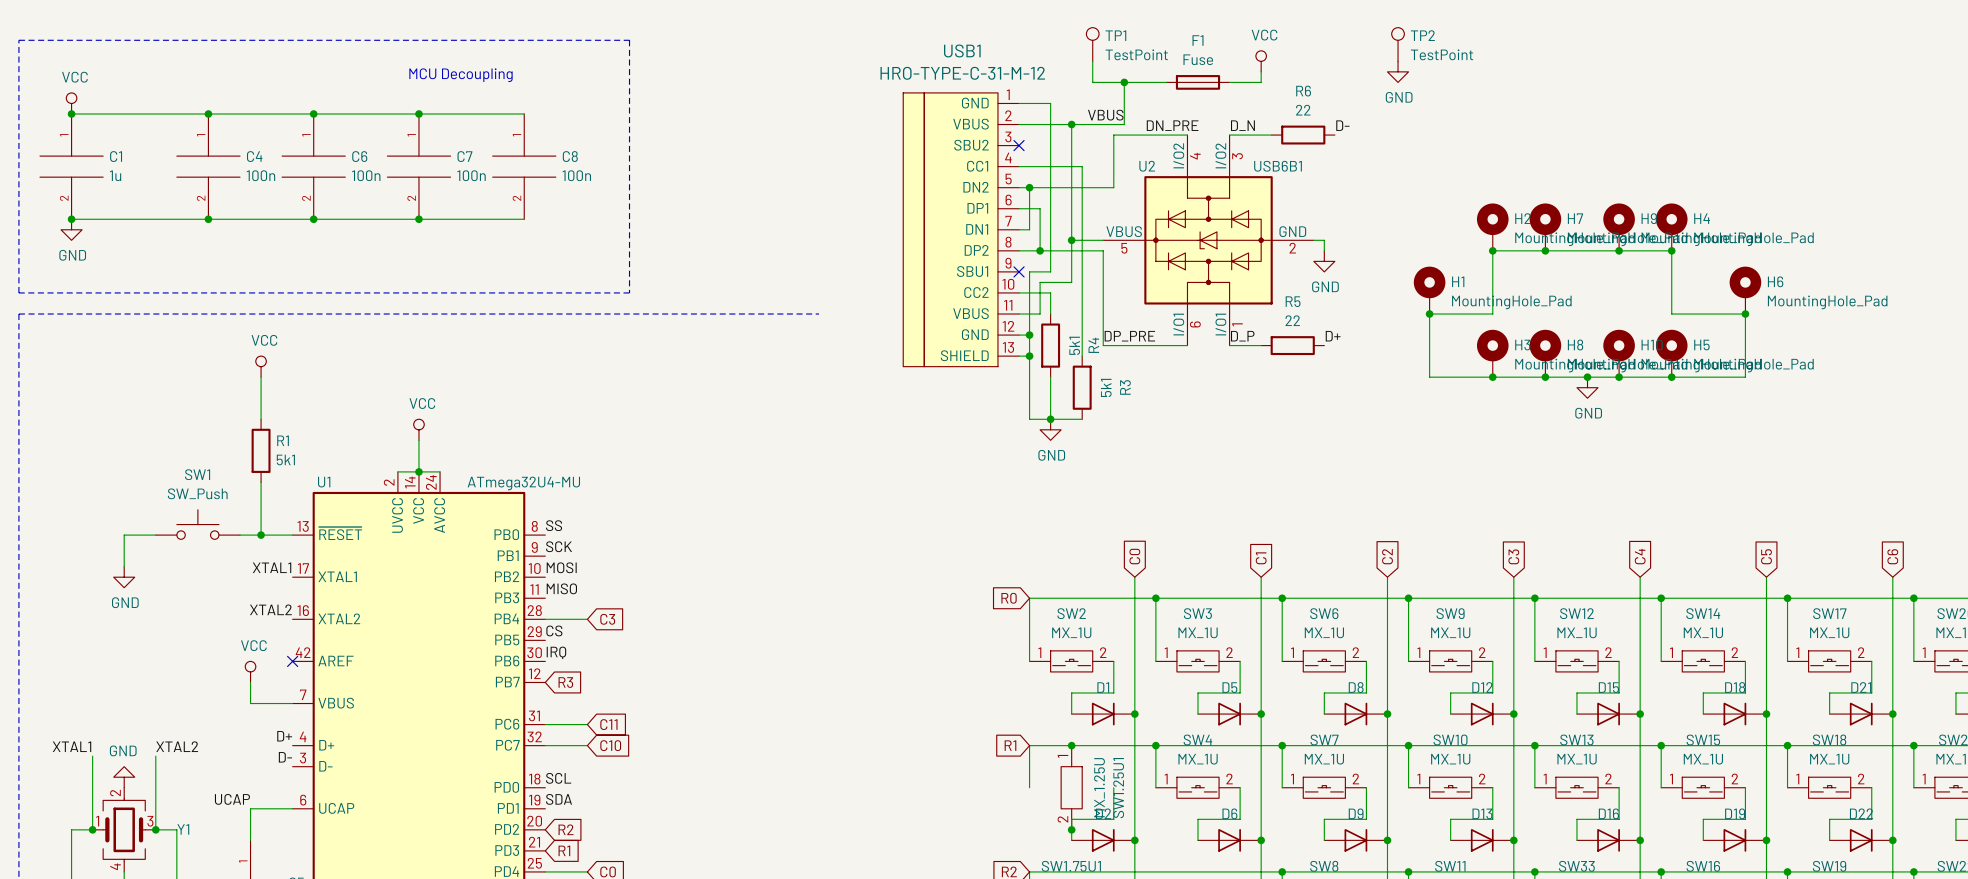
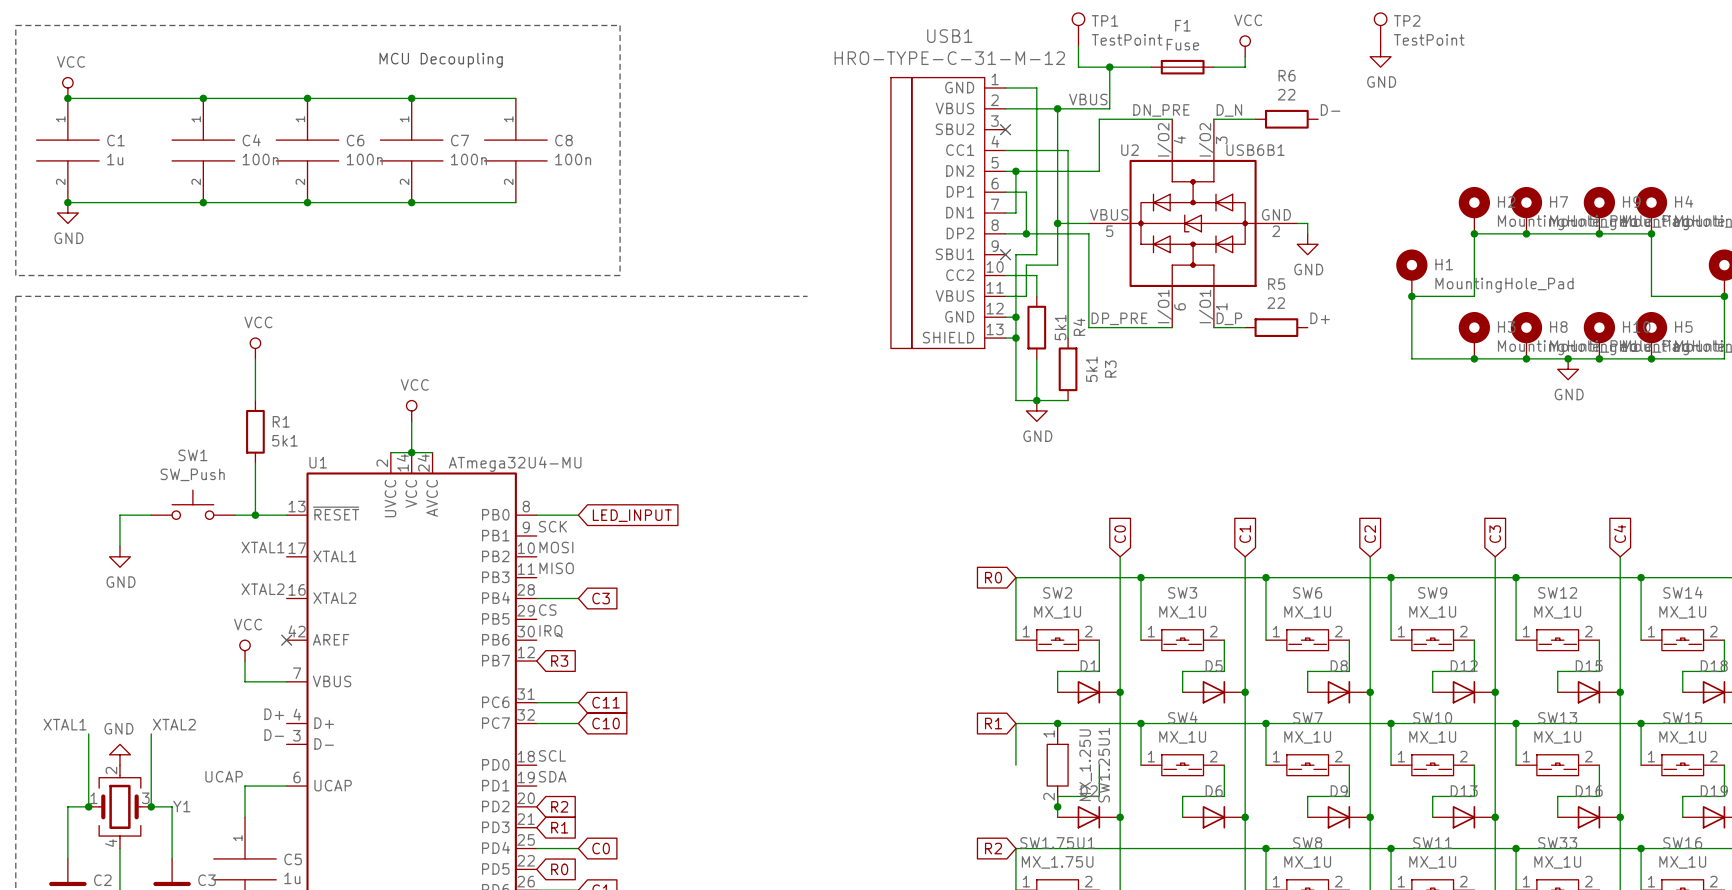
label: SS (554, 525) -> none
wire: none -> (536, 515) (578, 515)
global label: none -> LED_INPUT (632, 515)

